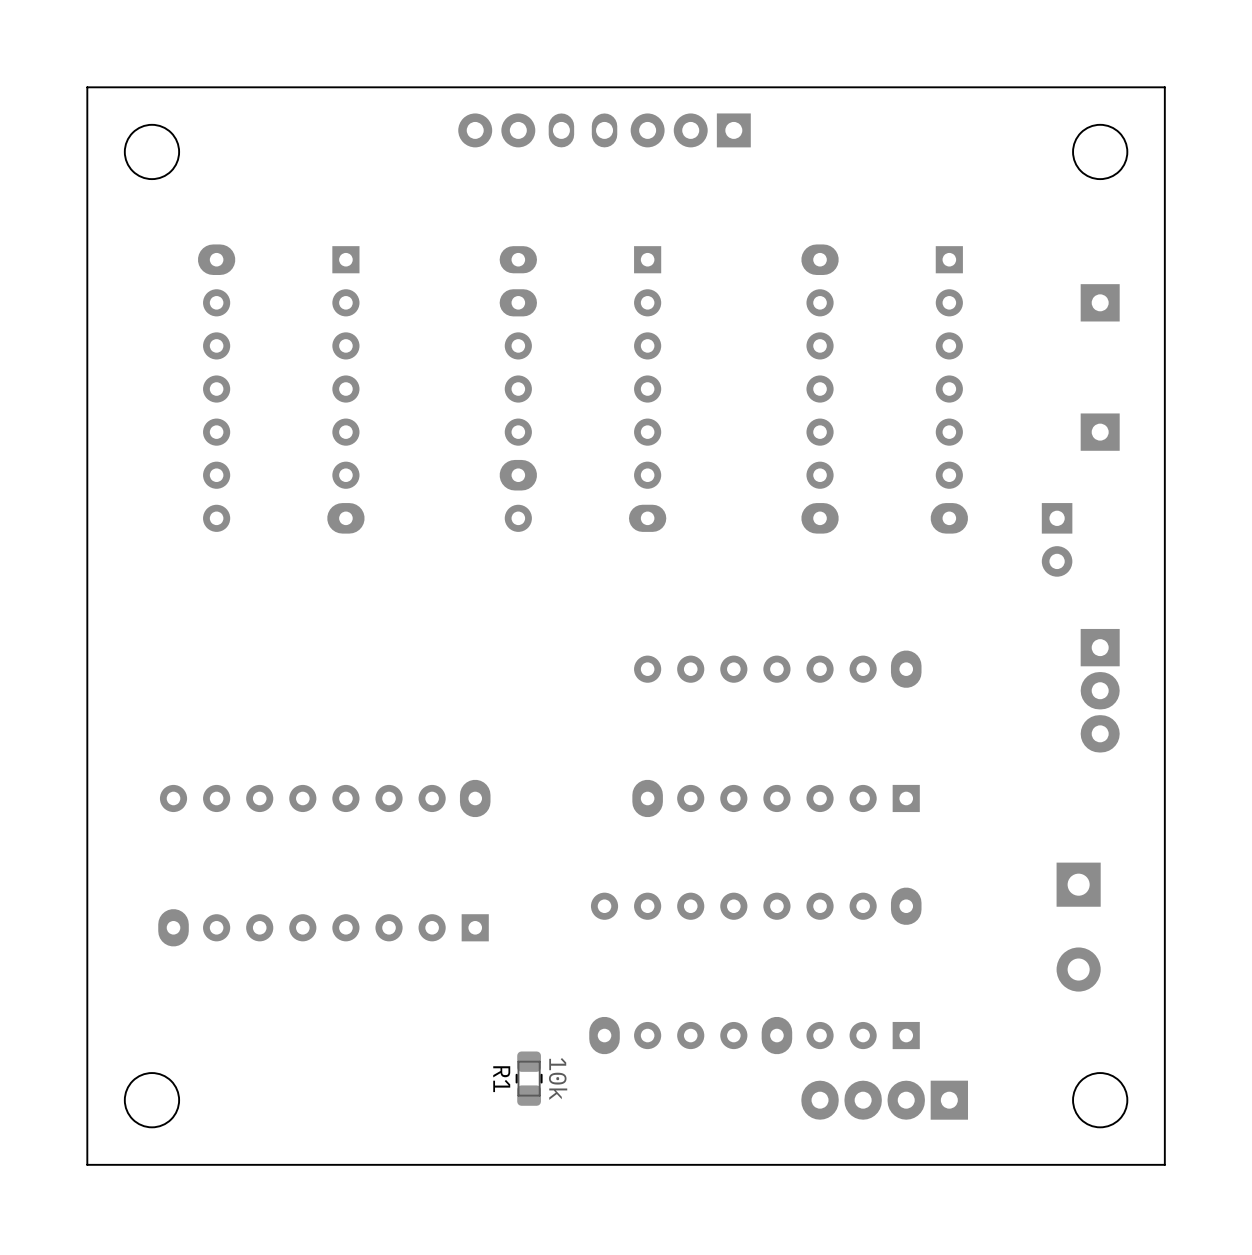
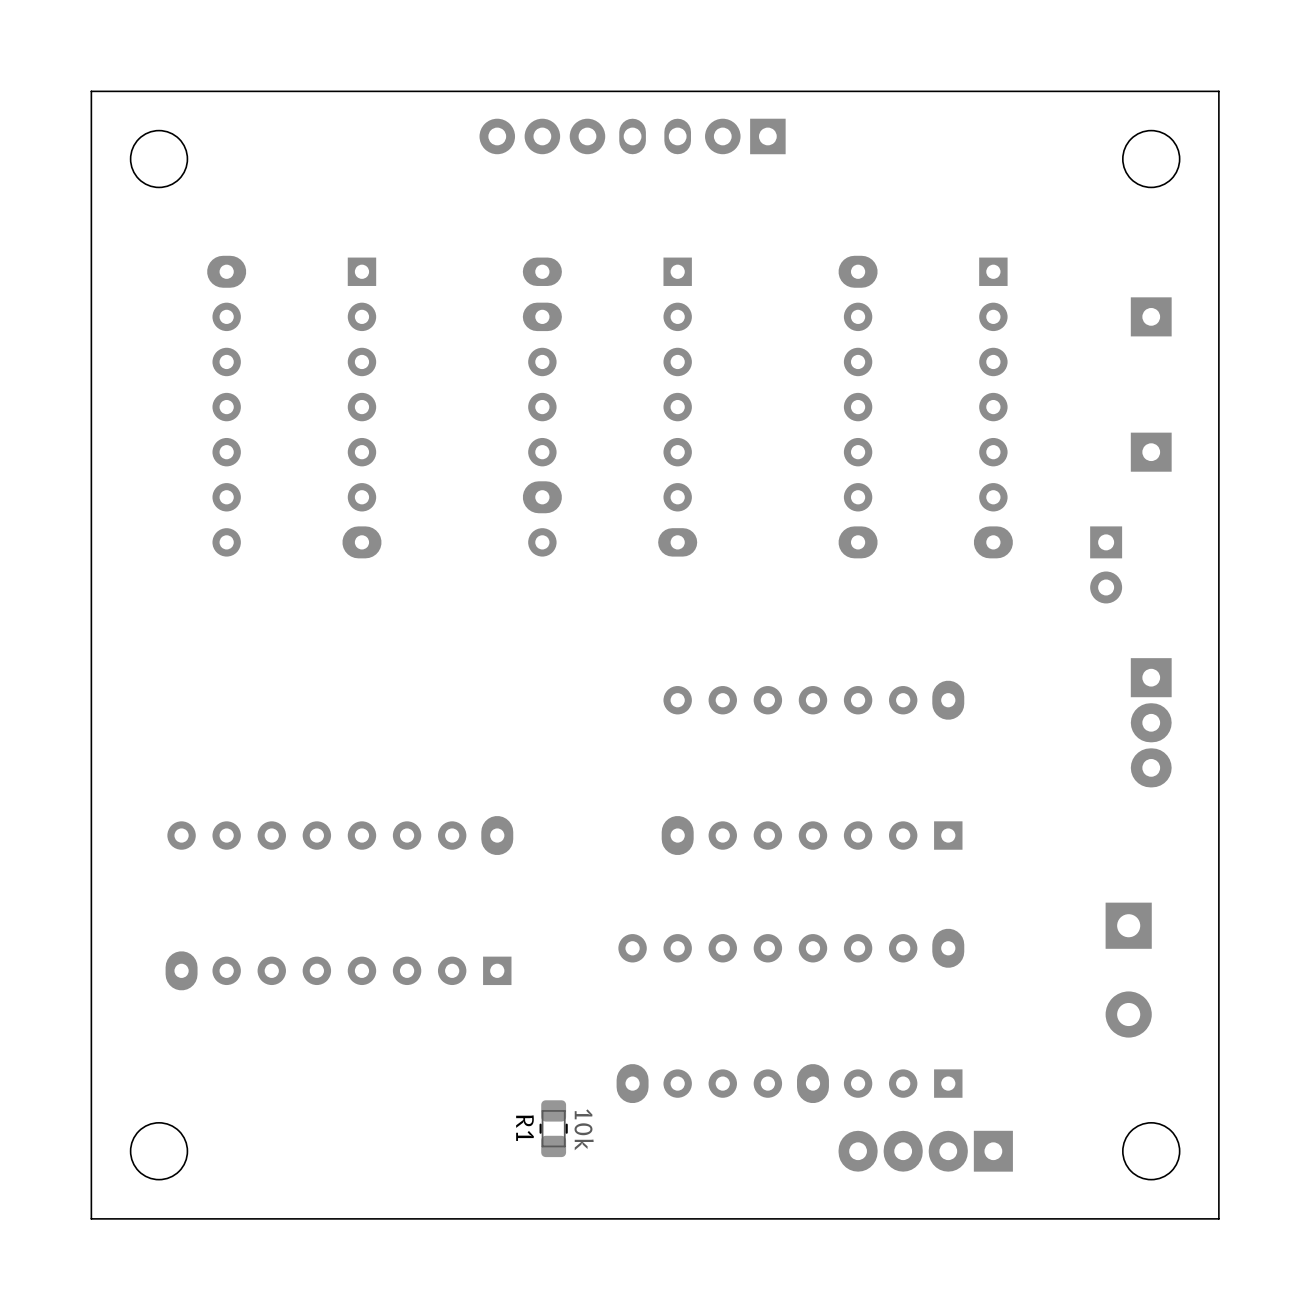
part footprint: [458, 113, 751, 148] -> [479, 118, 786, 155]

